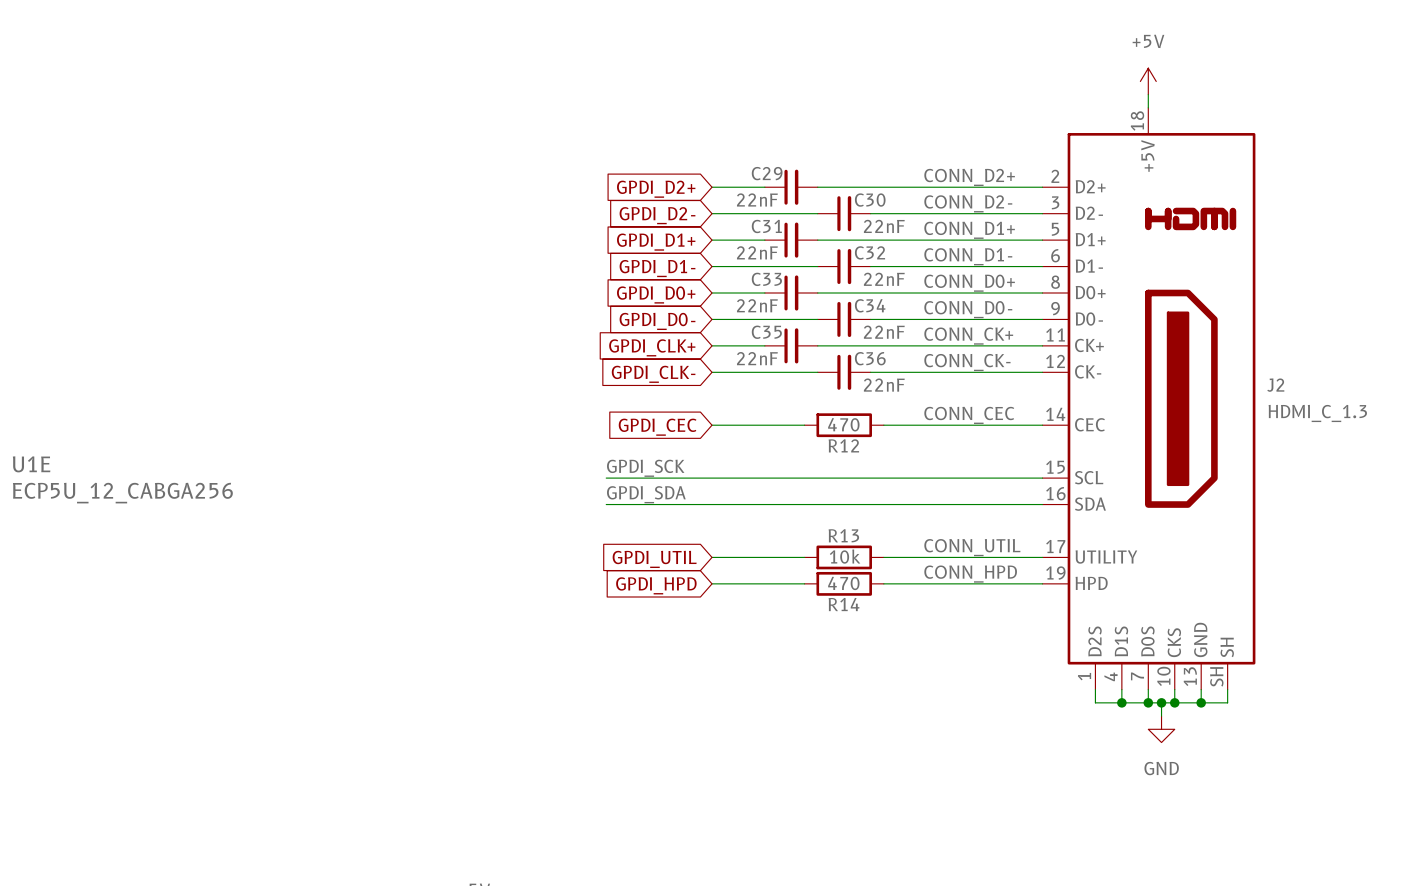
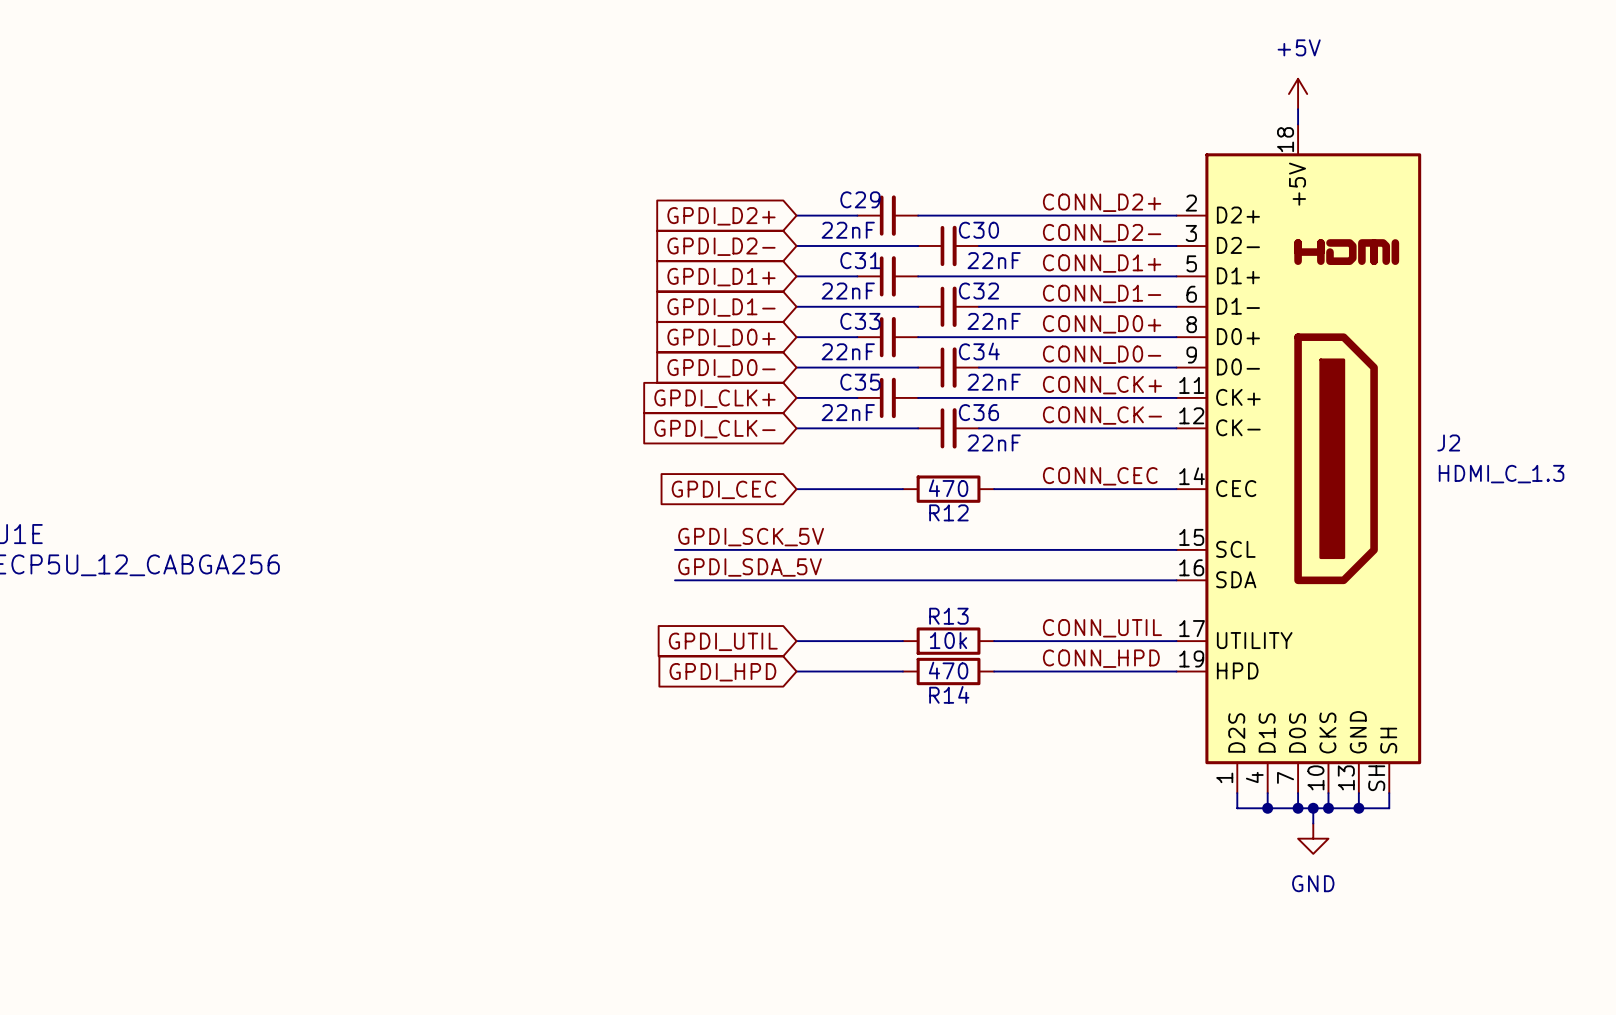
label: GPDI_SCK (645, 468) -> GPDI_SCK_5V (751, 537)
label: GPDI_SDA (646, 494) -> GPDI_SDA_5V (750, 567)

